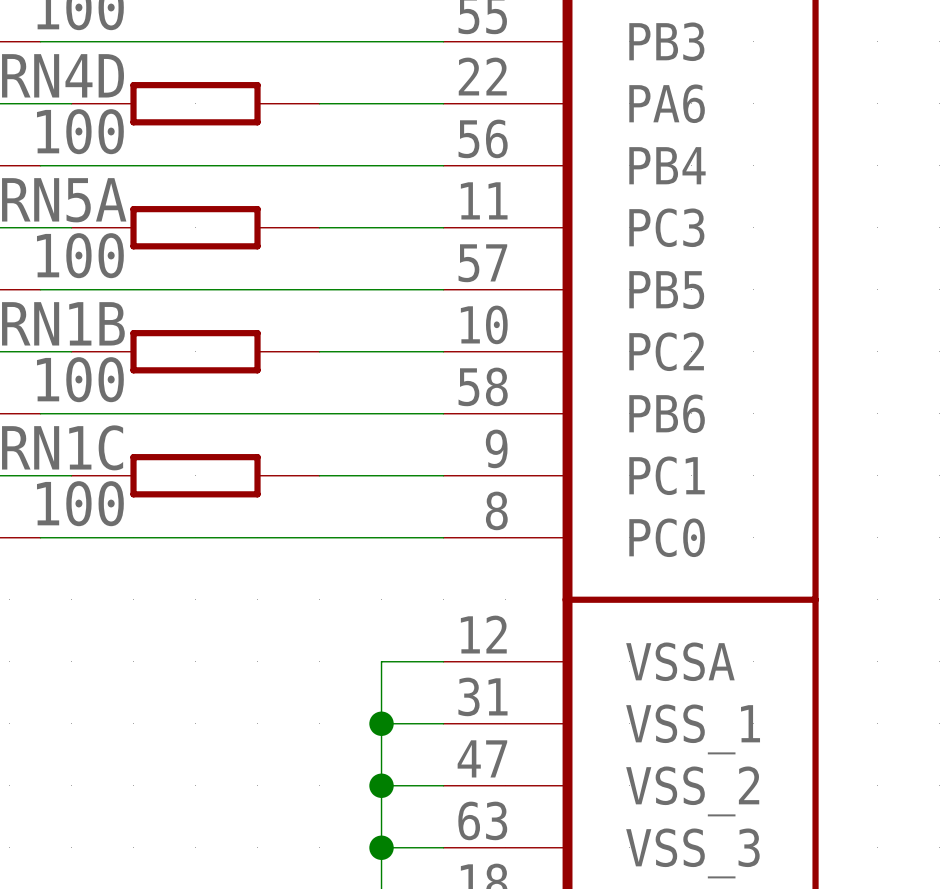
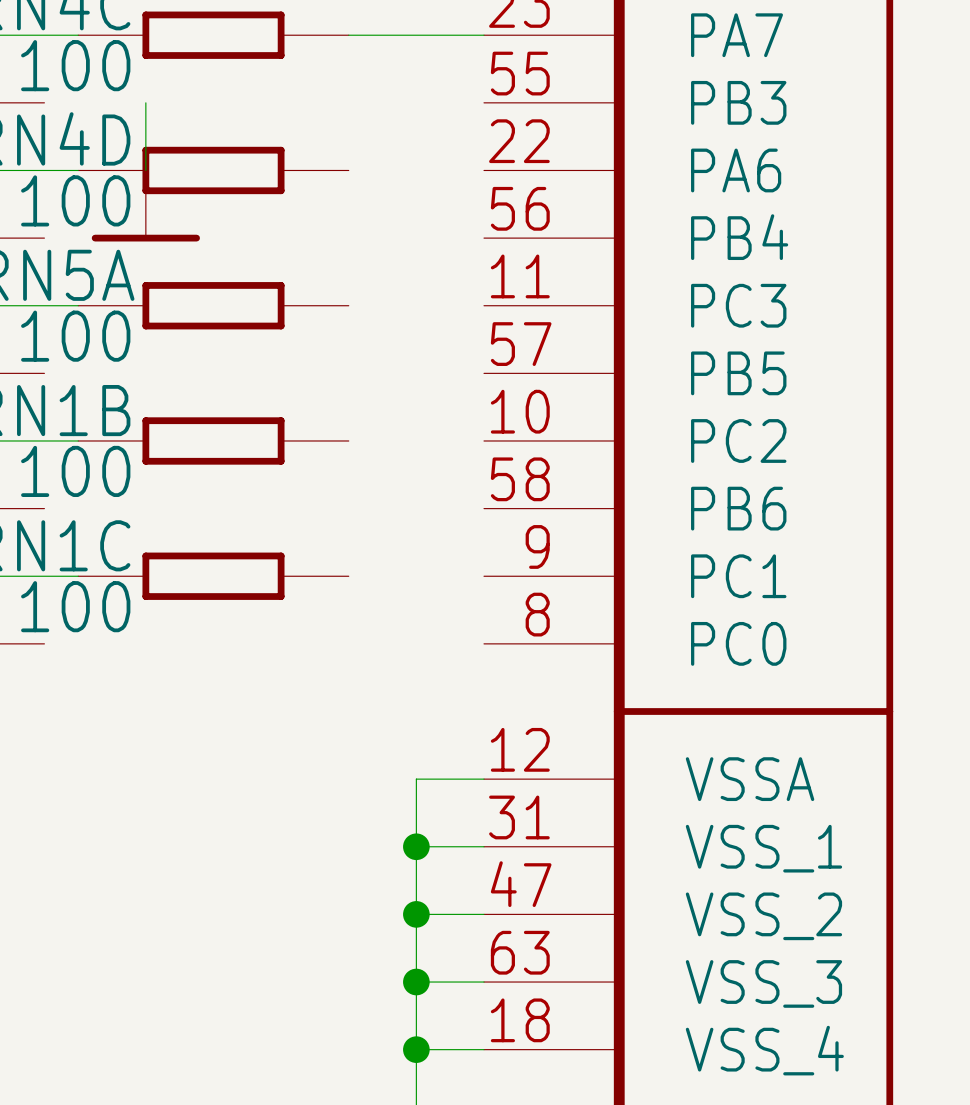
wire: (40, 41) (443, 41) -> none
wire: none -> (145, 102) (145, 170)
wire: (319, 103) (443, 103) -> none
power symbol: none -> (145, 205)
wire: (40, 165) (443, 165) -> none
wire: (319, 227) (443, 227) -> none
wire: (40, 289) (443, 289) -> none
wire: (319, 351) (443, 351) -> none
wire: (40, 413) (443, 413) -> none
wire: (319, 475) (443, 475) -> none
wire: (40, 537) (443, 537) -> none

